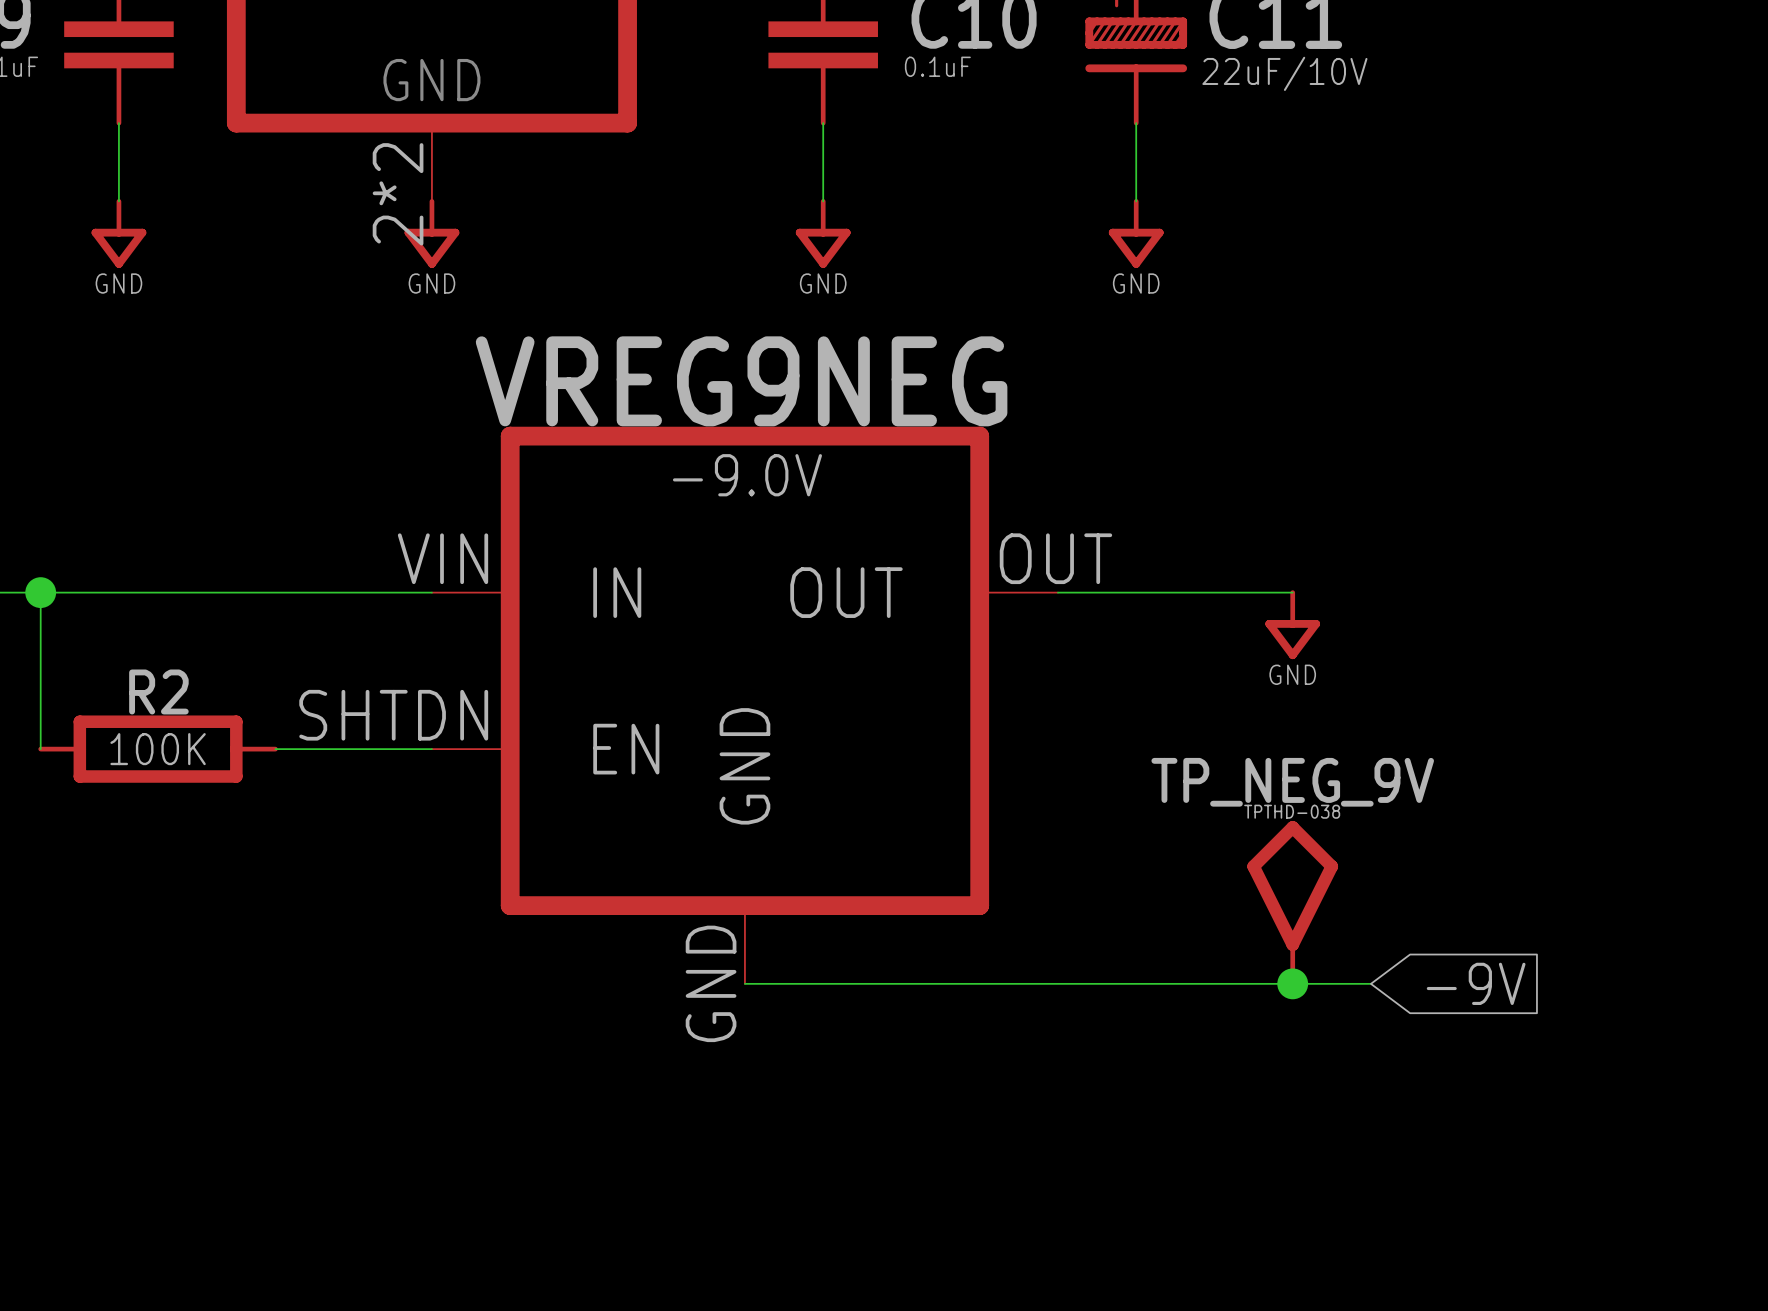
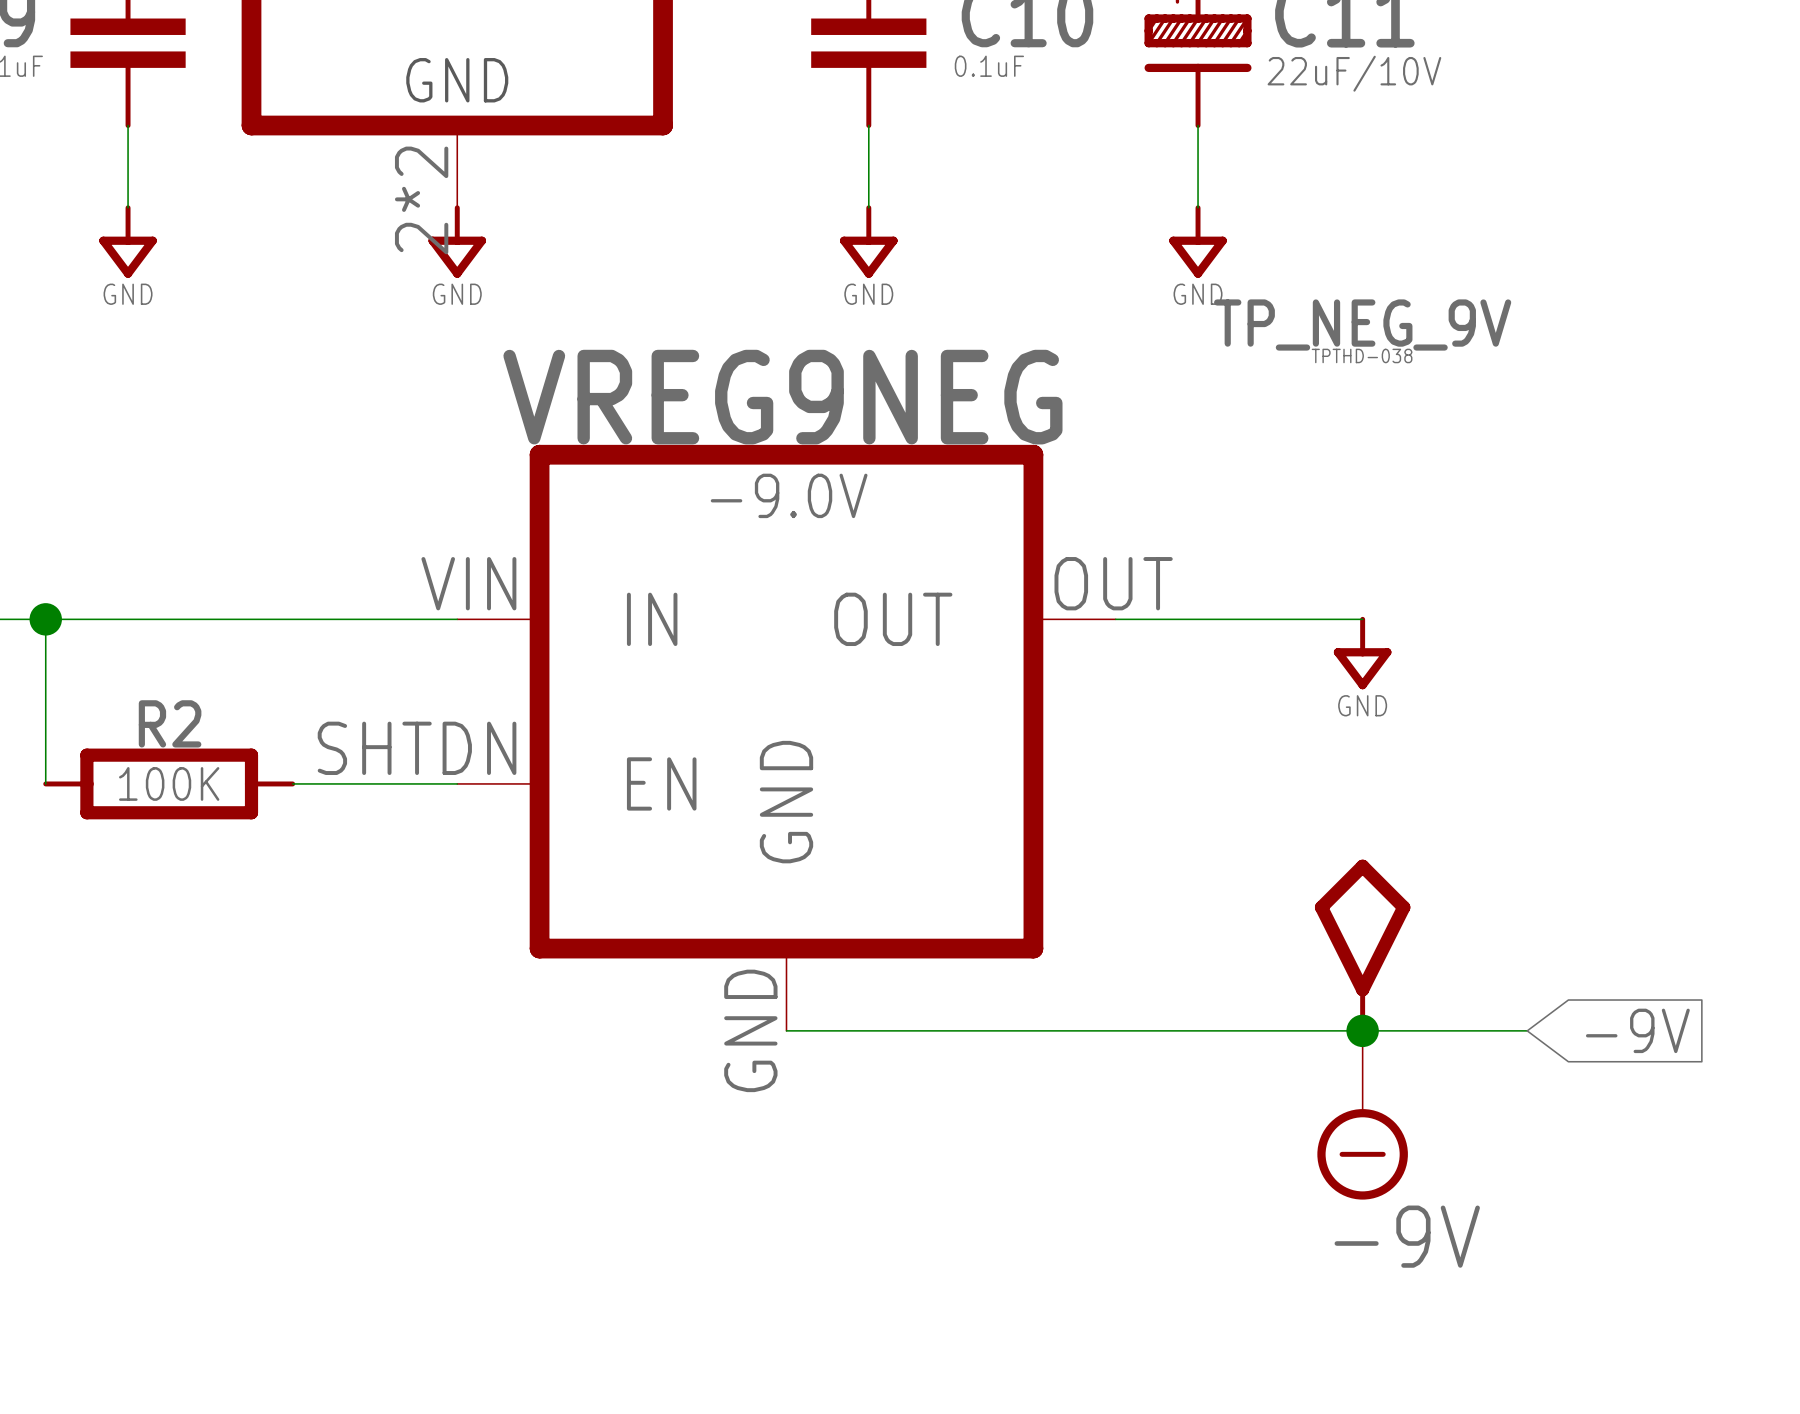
TP_NEG_9V name position: TP_NEG_9V (1292, 782) -> TP_NEG_9V (1362, 325)
TP_NEG_9V value position: TPTHD-038 (1292, 811) -> TPTHD-038 (1362, 355)
wire: none -> (1444, 1030) (1527, 1030)
global label position: -9V (1476, 983) -> -9V (1637, 1030)
power symbol: none -> -9V (1362, 1115)

